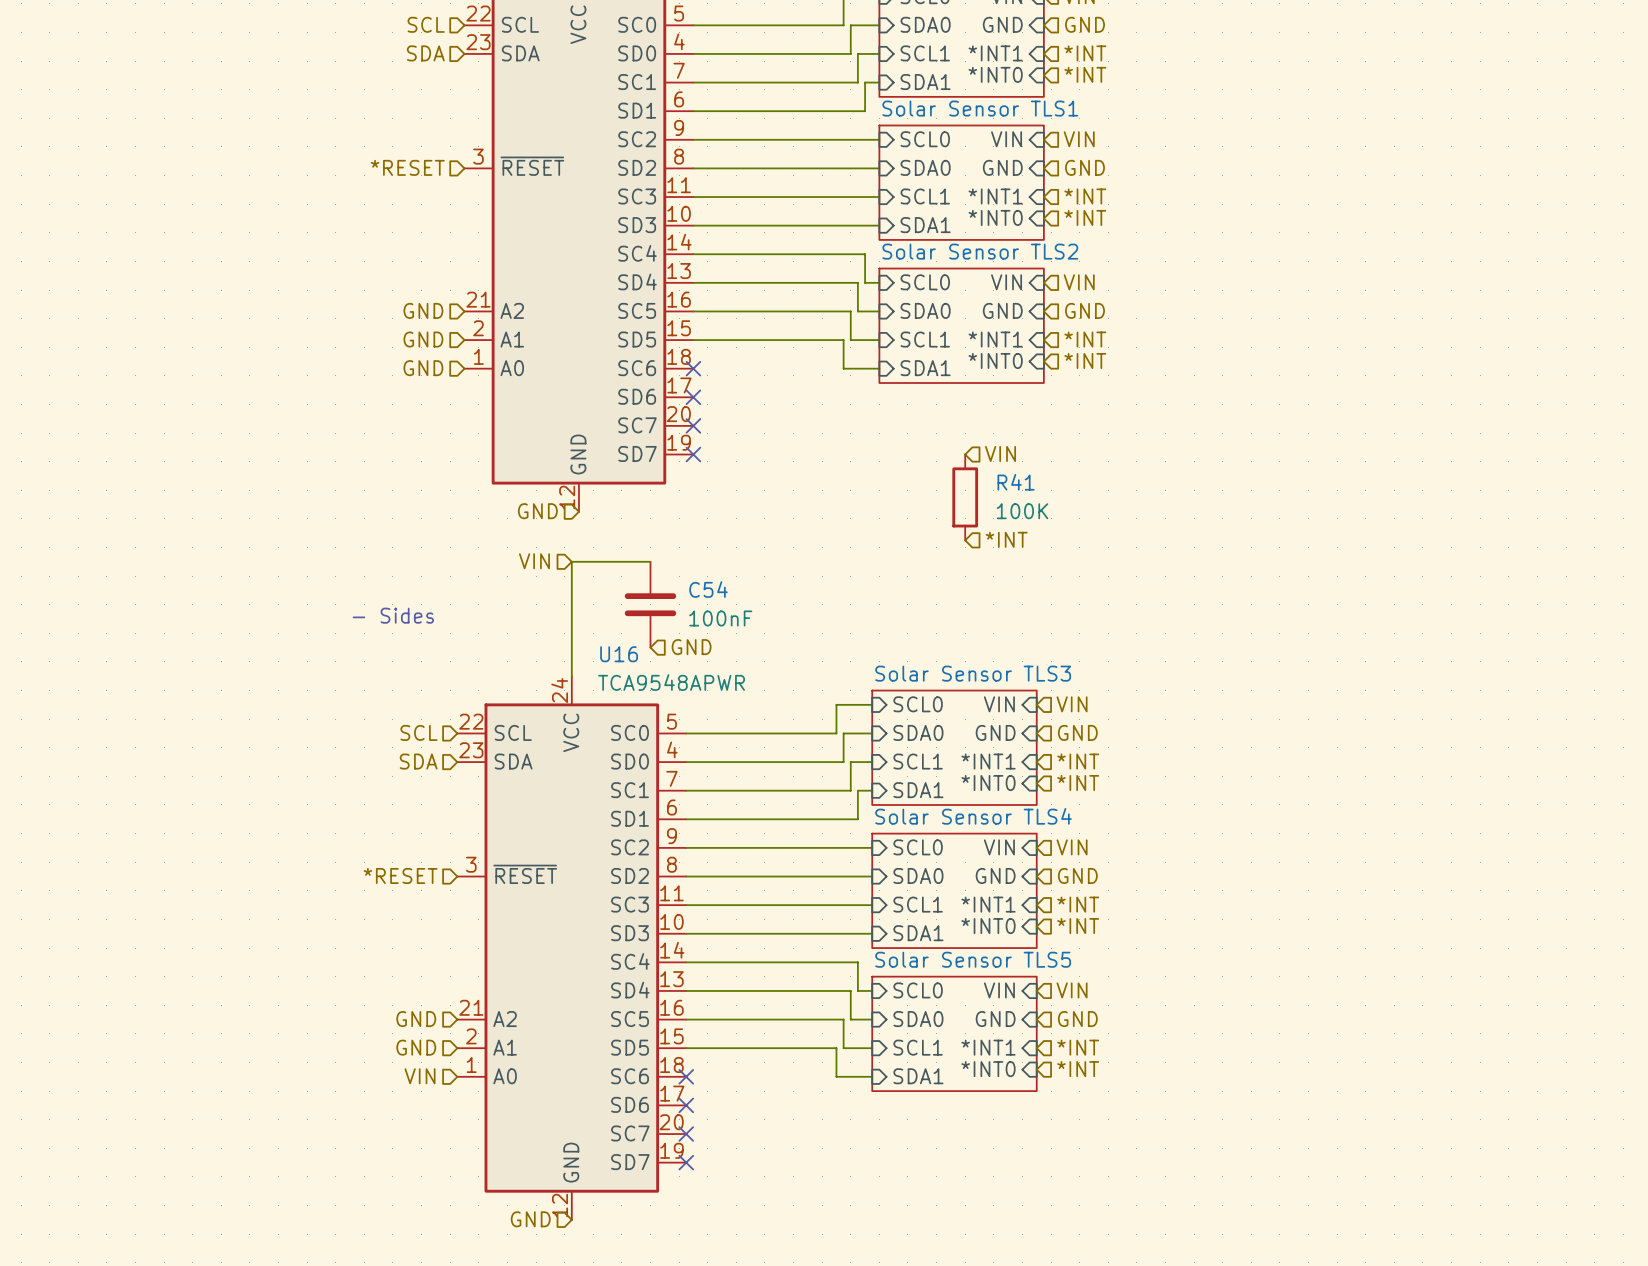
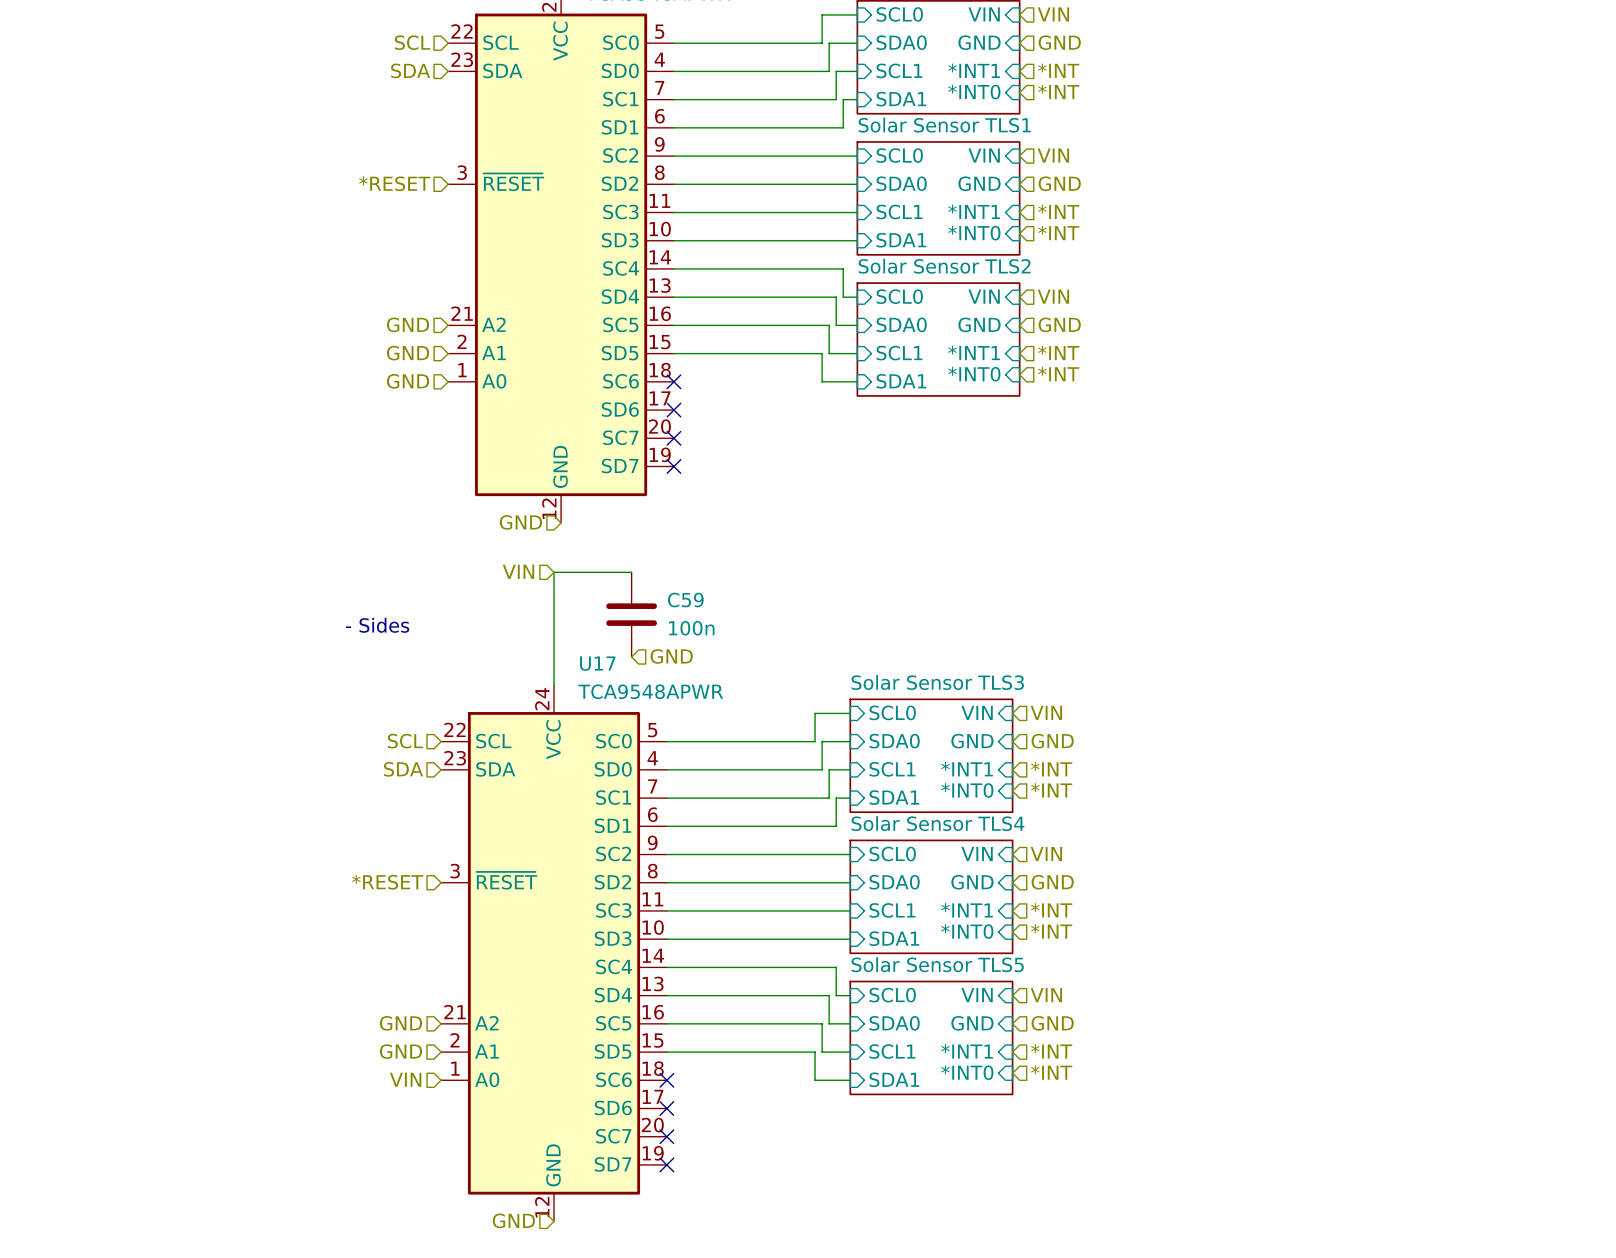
hierarchical label: VIN (1000, 453) -> none
R41: 100K (965, 497) -> none
hierarchical label: *INT (1006, 539) -> none
C54 name: C54 (708, 589) -> C59 (685, 600)
C54 value: 100nF (720, 618) -> 100n (691, 628)
U16 name: U16 (619, 654) -> U17 (597, 663)

